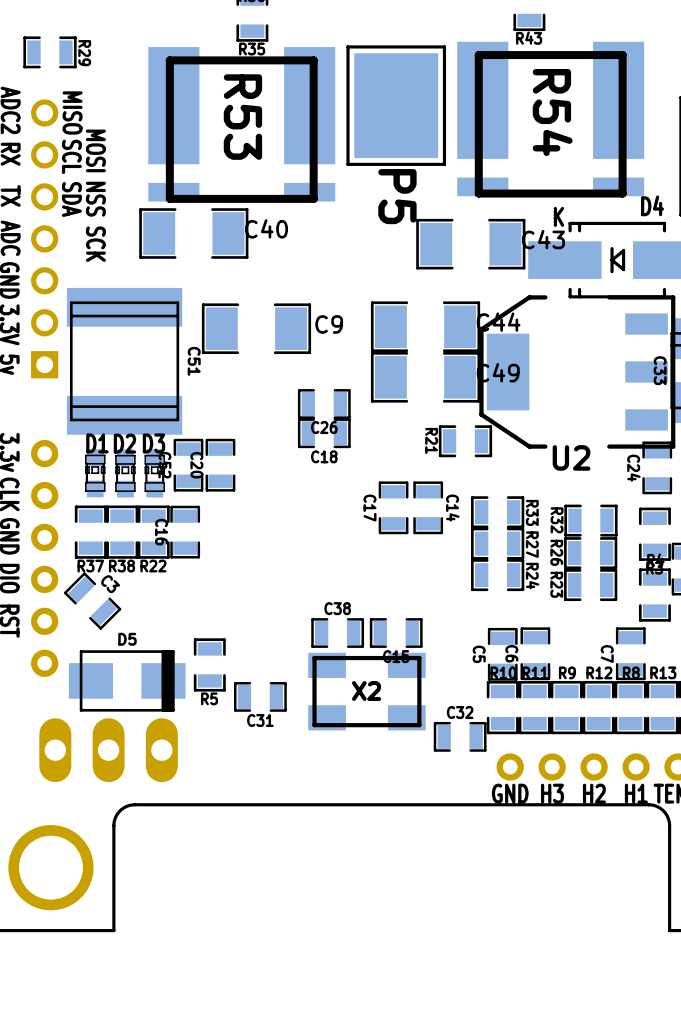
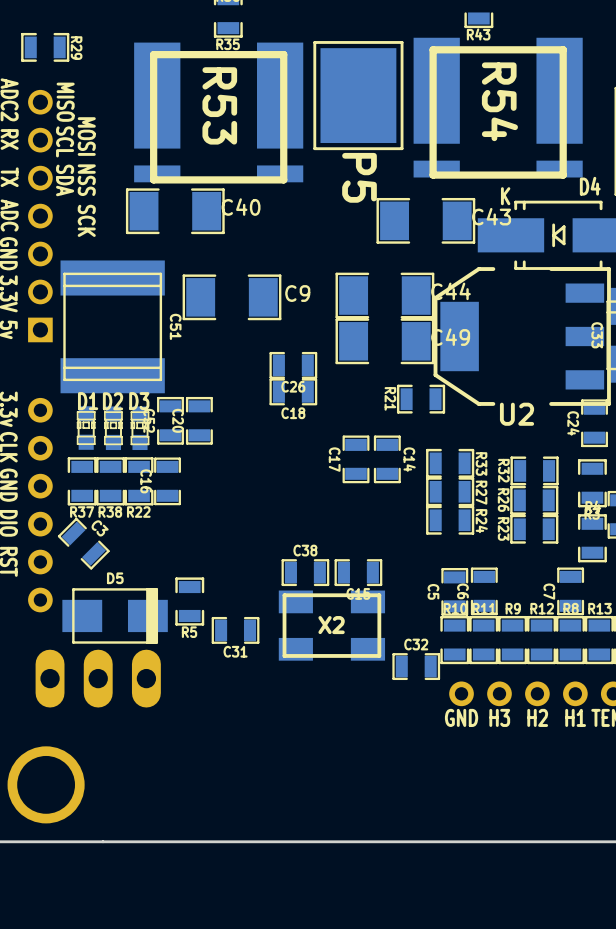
board edge: (669, 930) (669, 823) (666, 814) (661, 809) (648, 804) (130, 805) (120, 810) (114, 823) (113, 930) -> (605, 841) (103, 841)

